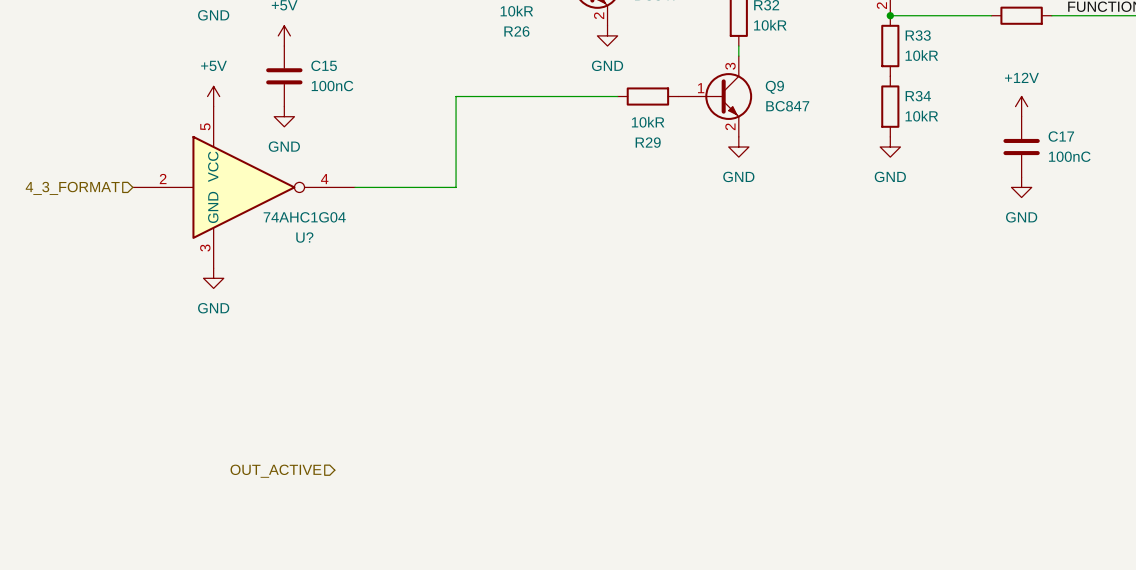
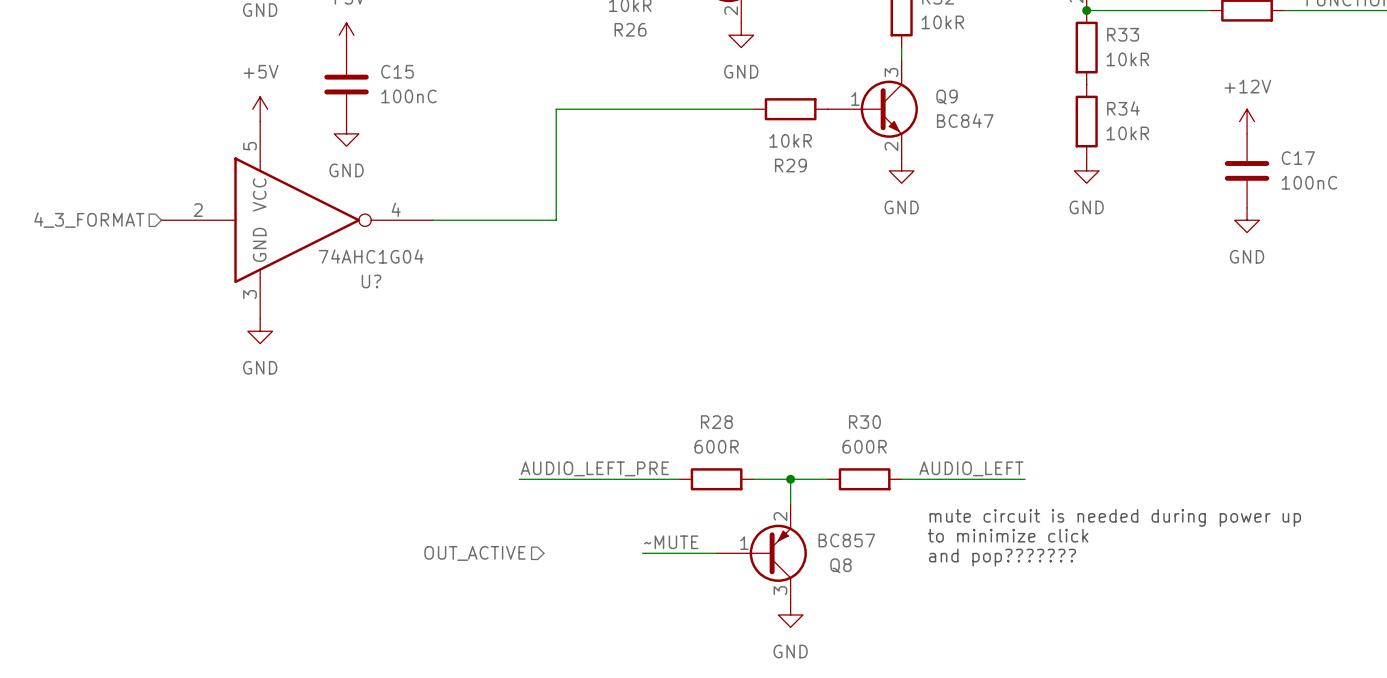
label: none -> AUDIO_LEFT_PRE (594, 468)
label: none -> AUDIO_LEFT (971, 468)
wire: none -> (519, 479) (679, 479)
R28: none -> 600R (716, 479)
wire: none -> (753, 479) (827, 479)
wire: none -> (790, 479) (790, 503)
junction: none -> (790, 479)
R30: none -> 600R (864, 479)
wire: none -> (901, 479) (1025, 479)
text: none -> mute circuit is needed during power up (1115, 517)
text: none -> to minimize click (1008, 535)
label: none -> ~MUTE (671, 542)
wire: none -> (642, 553) (716, 553)
Q8: none -> BC857 (761, 553)
text: none -> and pop??????? (1002, 557)
hierarchical label position: OUT_ACTIVE (275, 471) -> OUT_ACTIVE (474, 553)
power symbol: none -> GND (790, 614)

